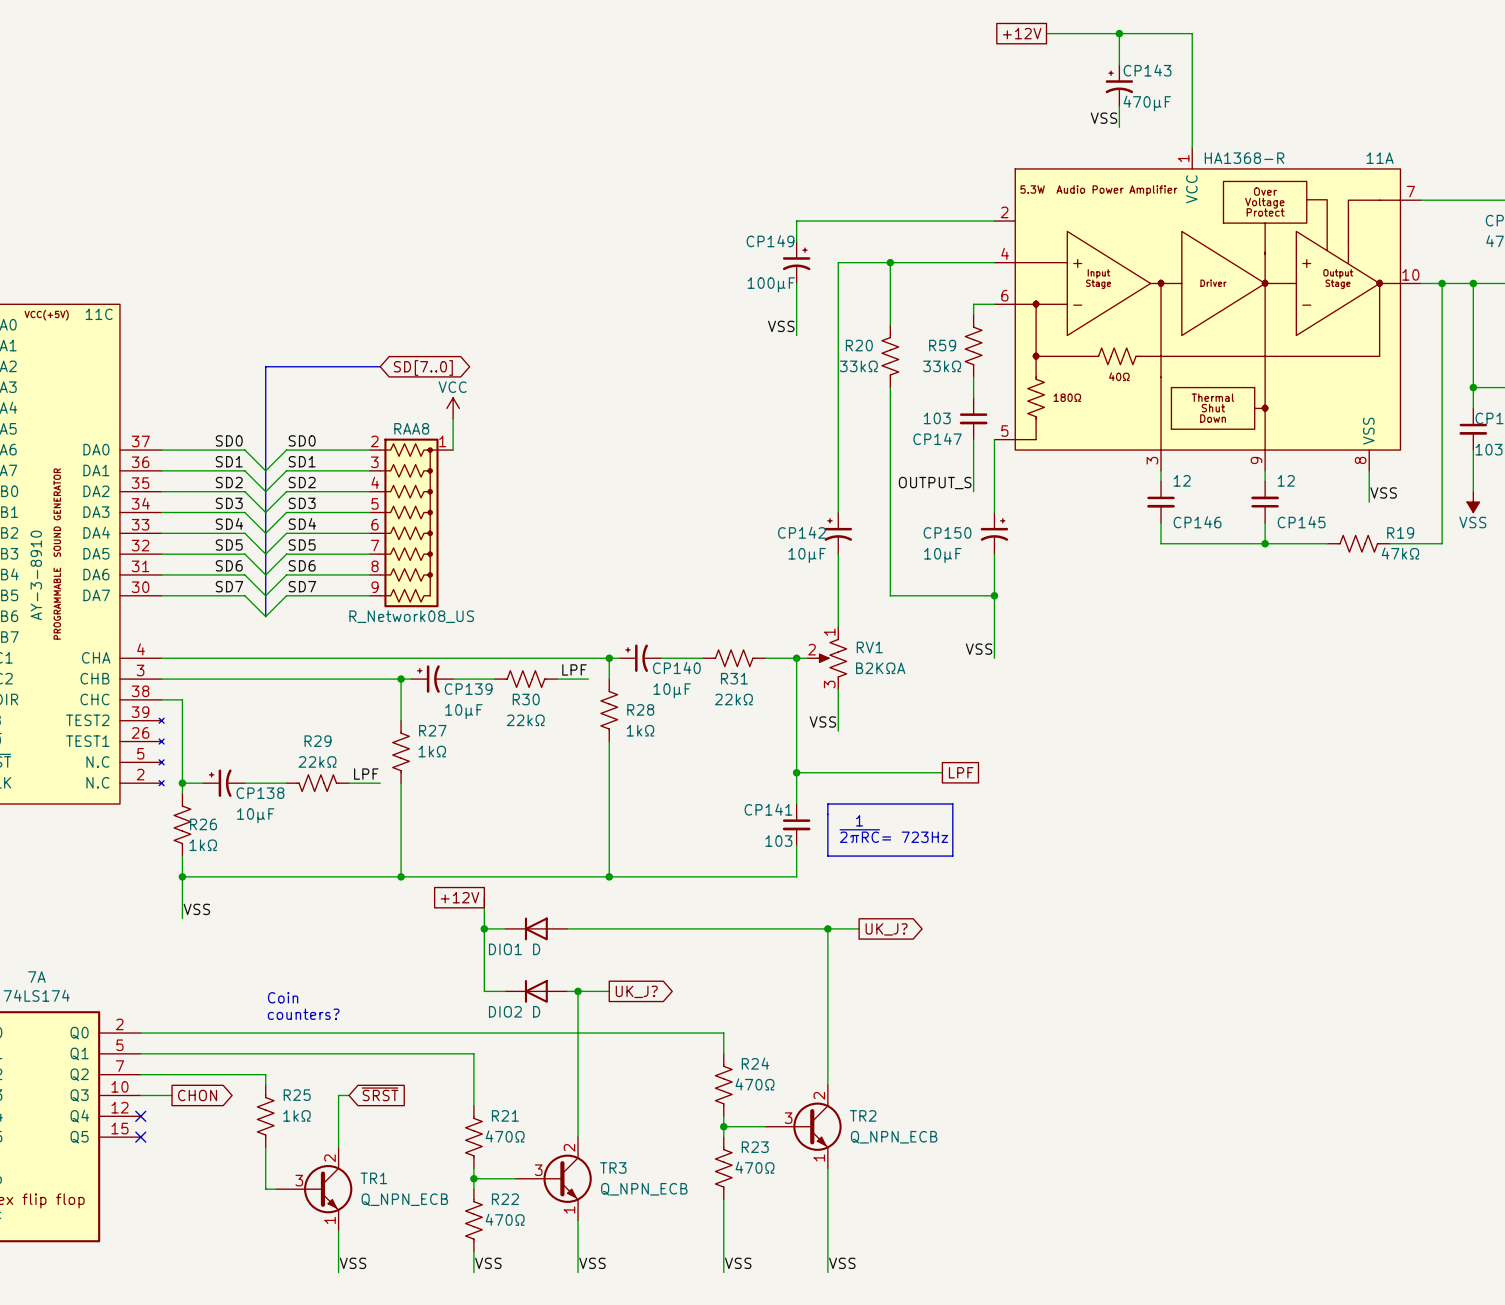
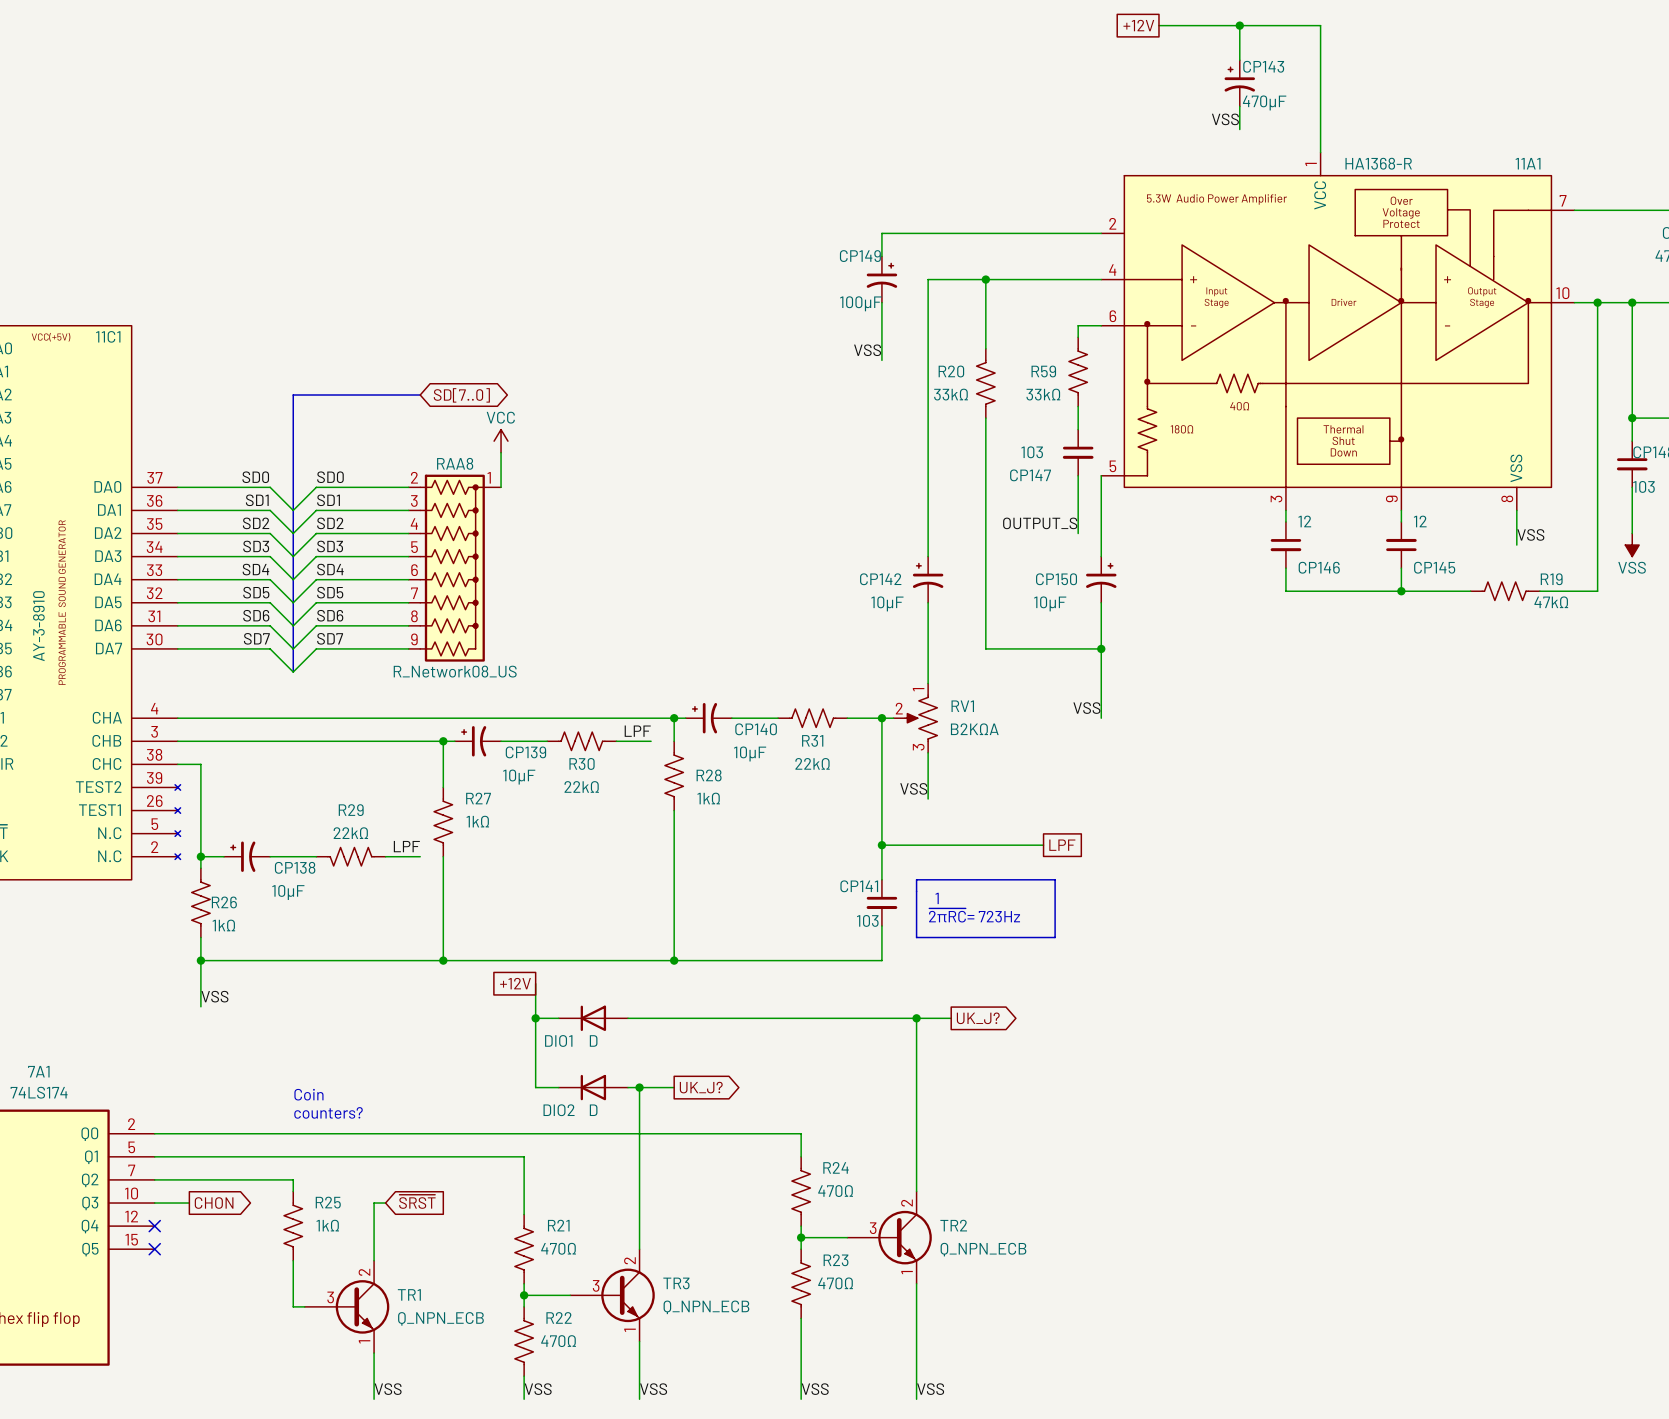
11A name: 11A (1380, 158) -> 11A1 (1528, 163)
11C name: 11C (99, 314) -> 11C1 (108, 336)
7A name: 7A (36, 977) -> 7A1 (38, 1071)

